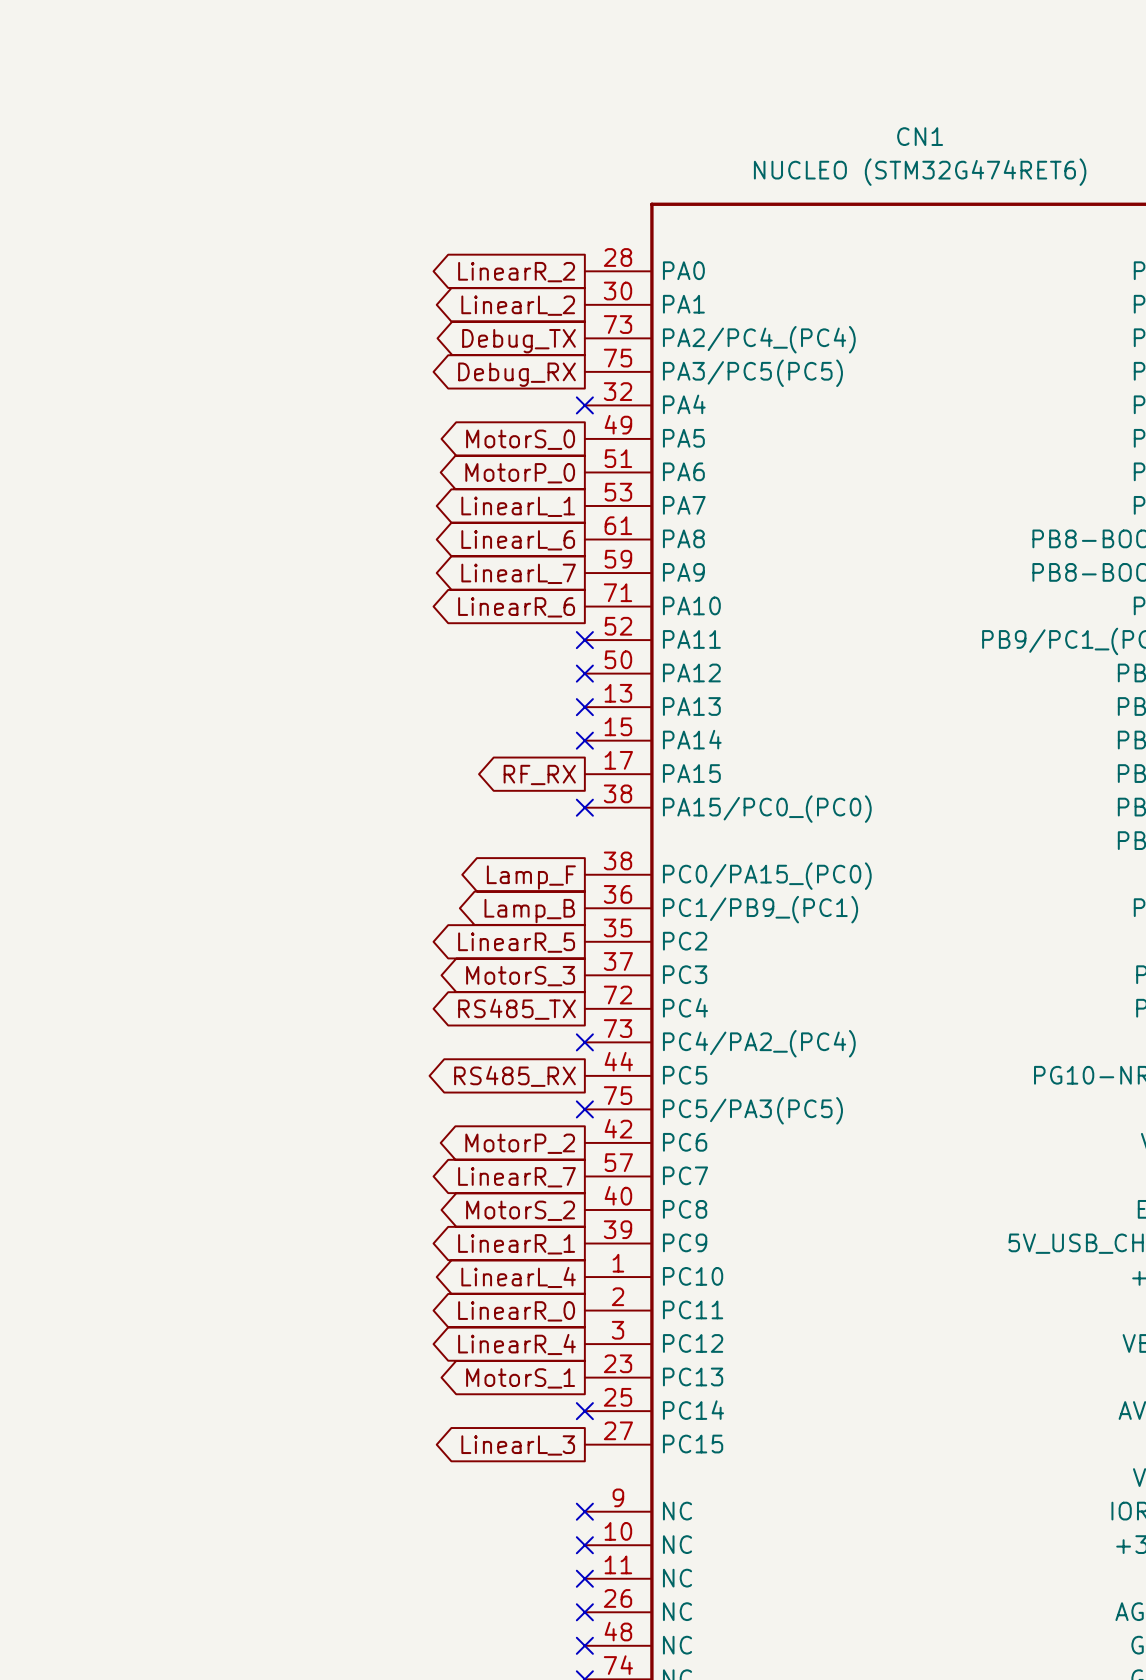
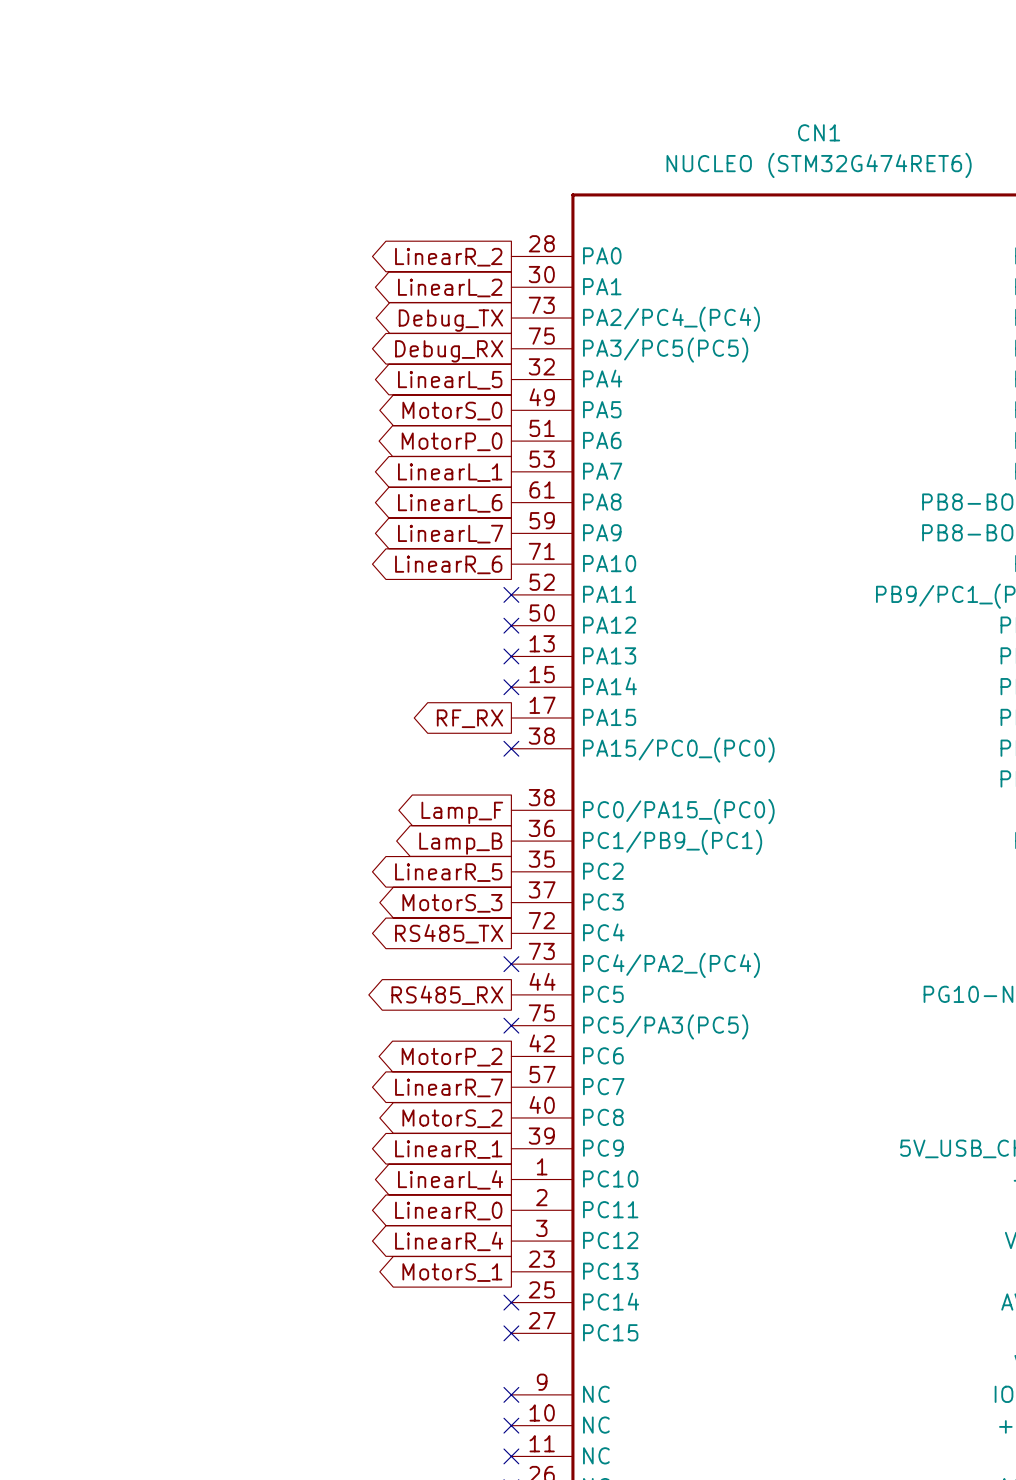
no-connect mark: (584, 405) -> none
global label: none -> LinearL_5 (450, 380)
no-connect mark: none -> (511, 1333)
global label: LinearL_3 (518, 1445) -> none

